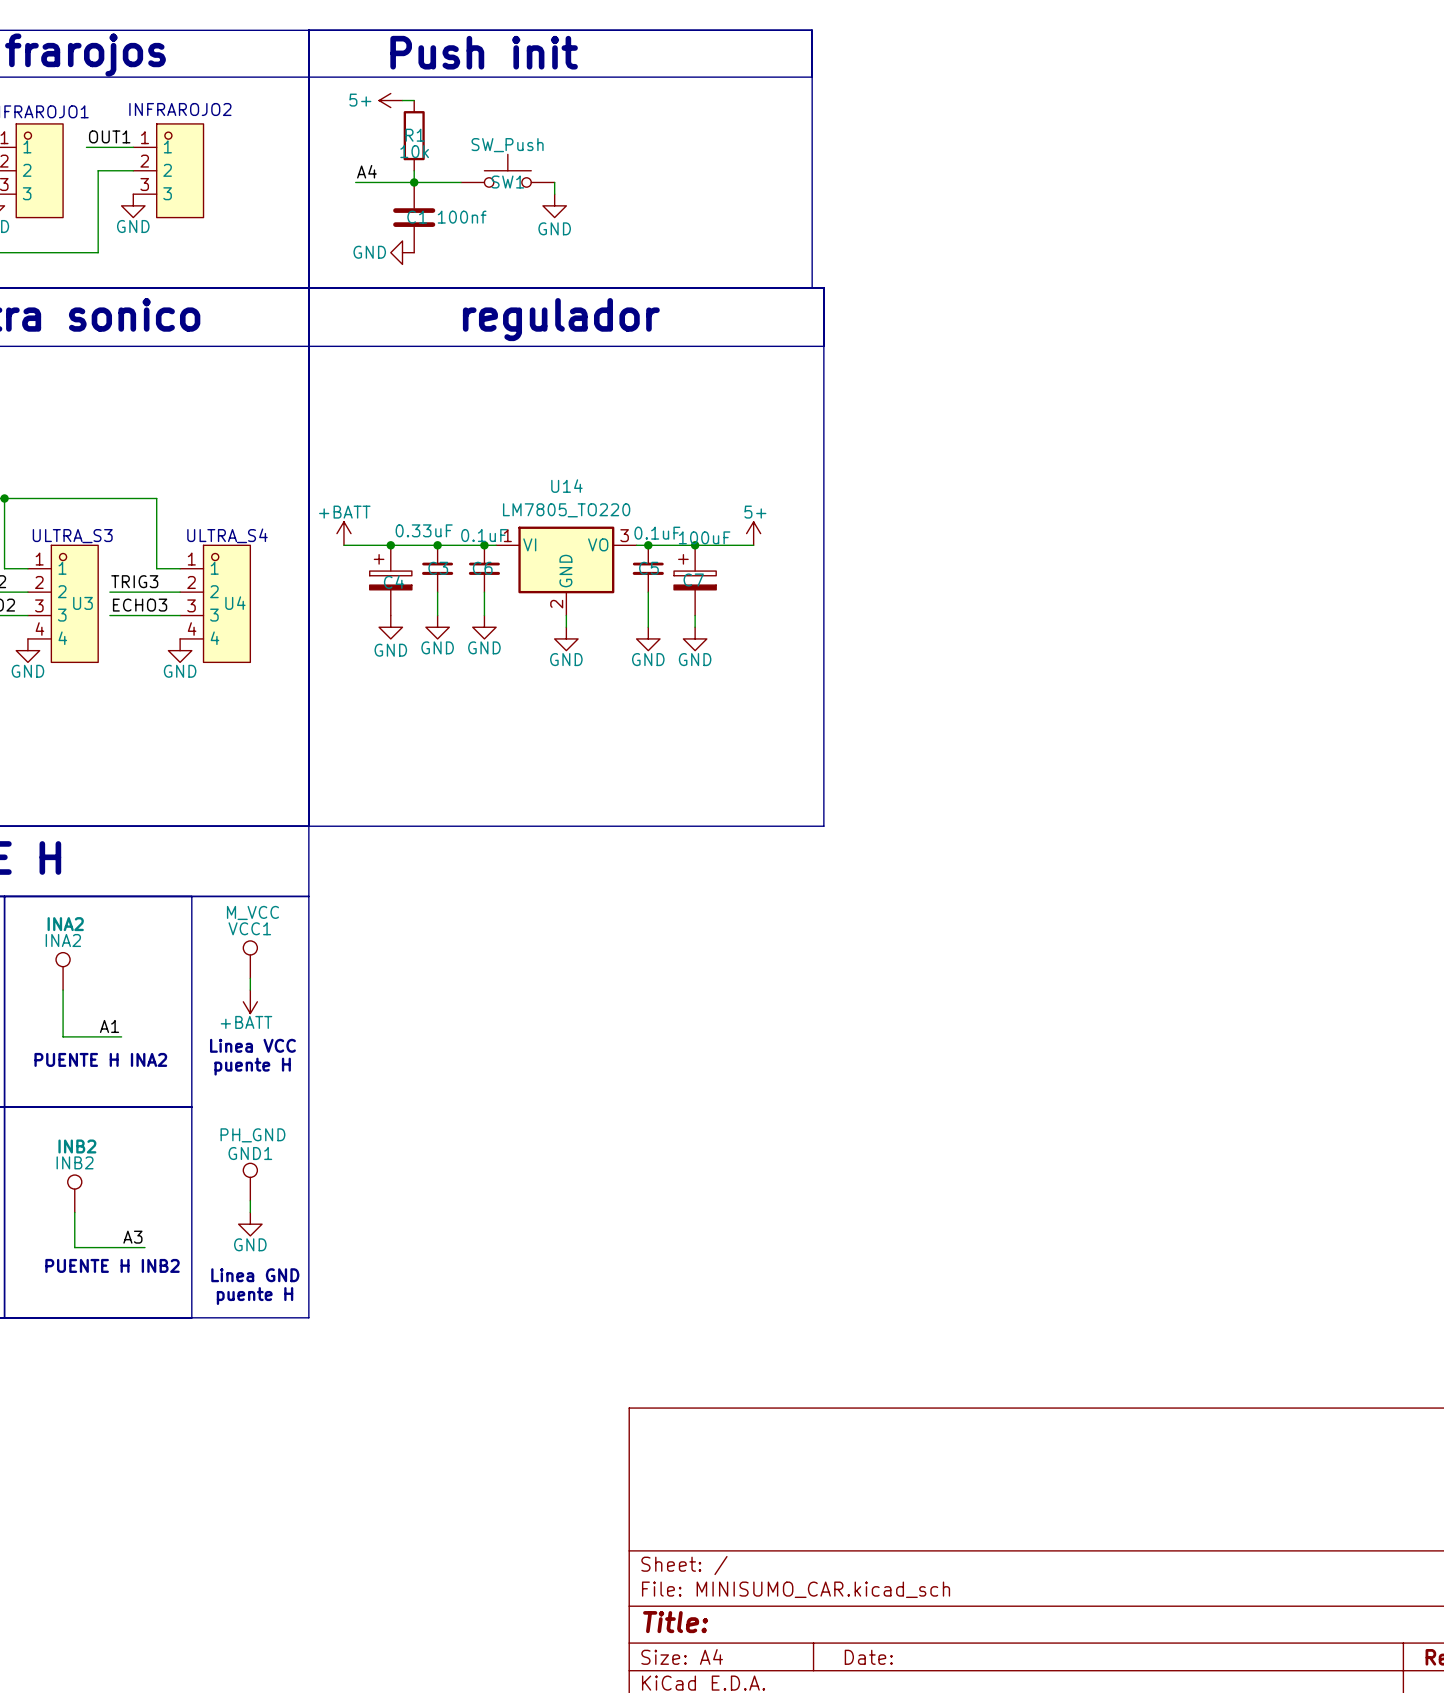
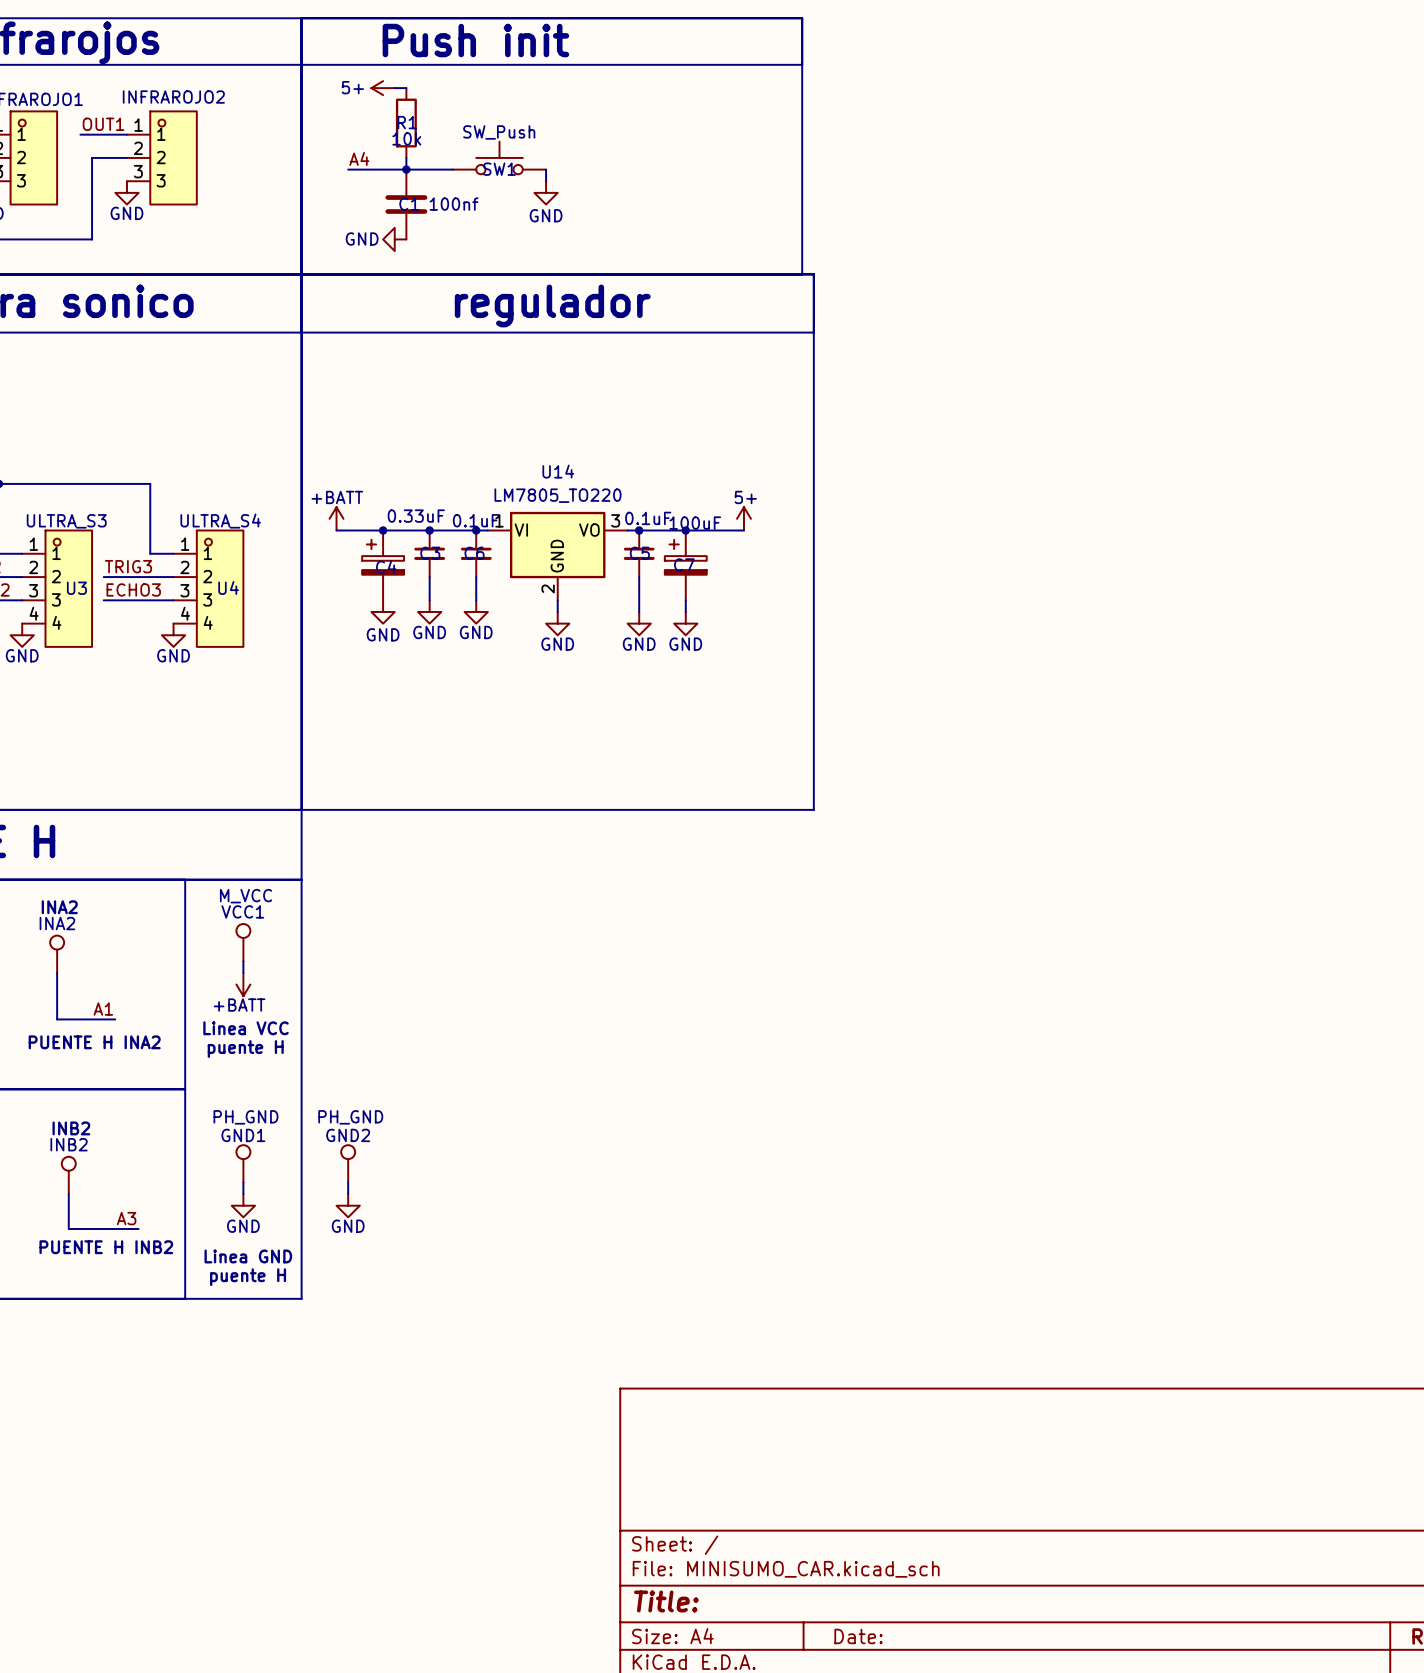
GND2: none -> PH_GND (348, 1163)
wire: none -> (348, 1182) (348, 1194)
power symbol: none -> GND (348, 1205)

